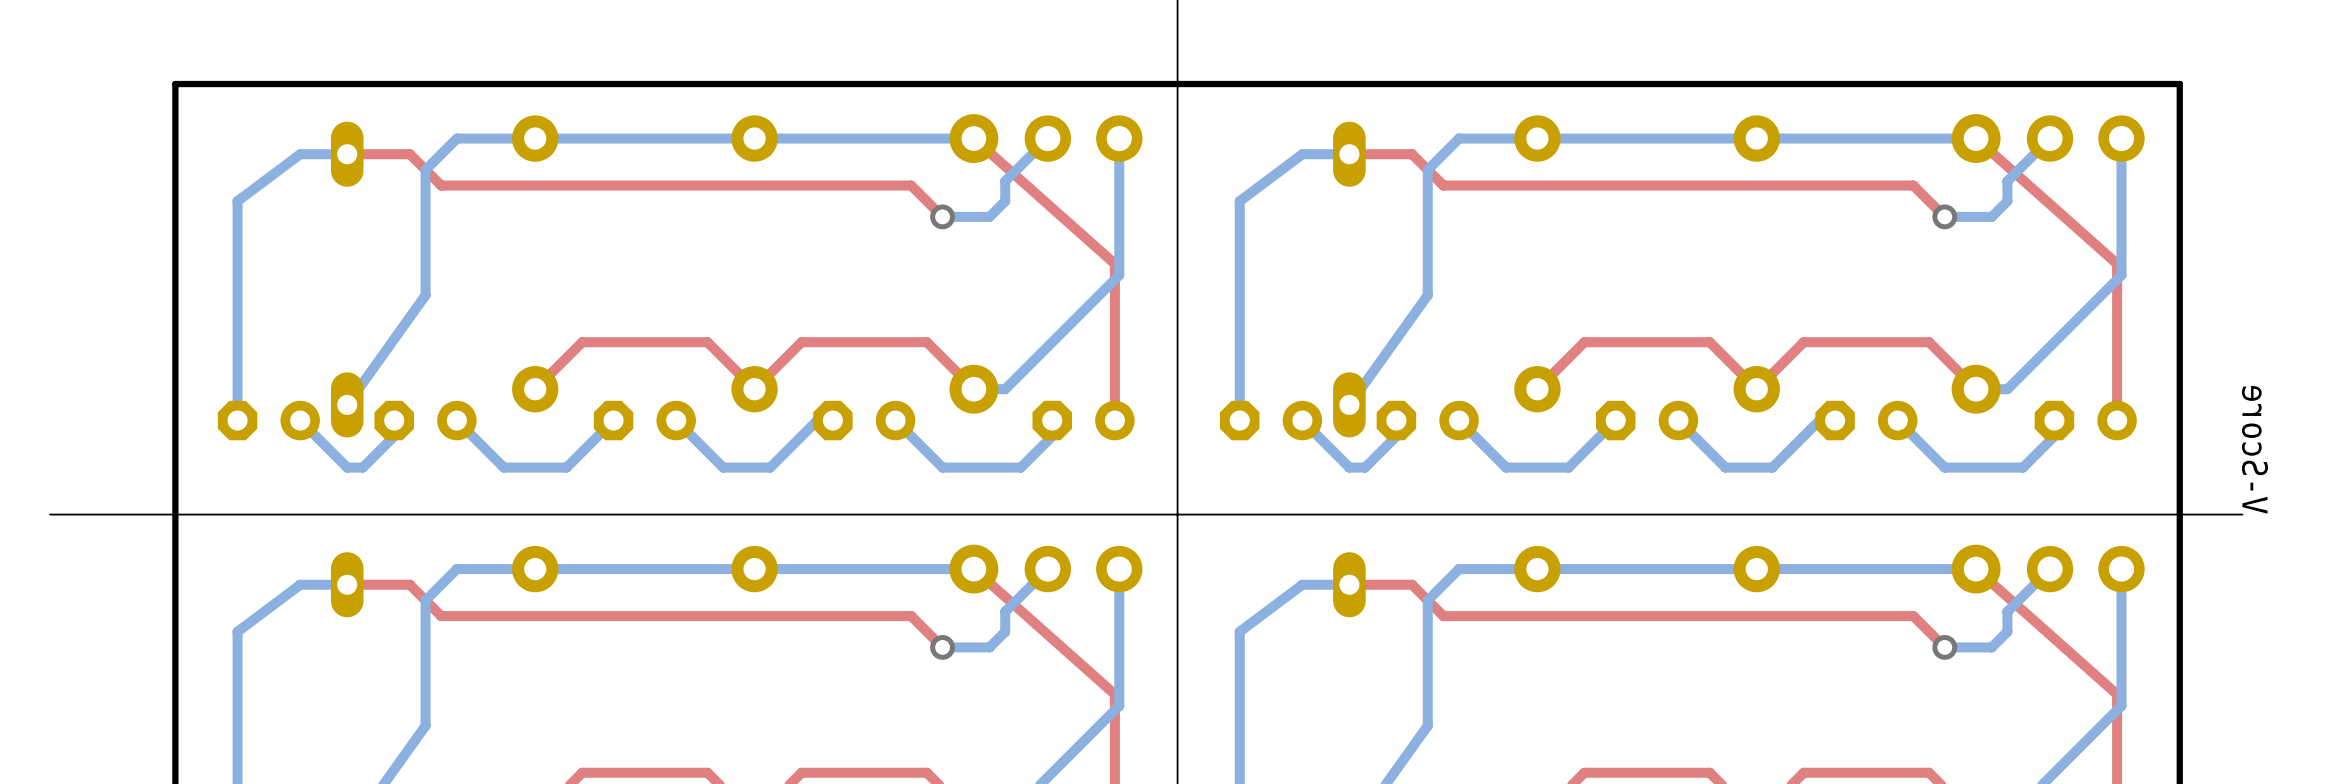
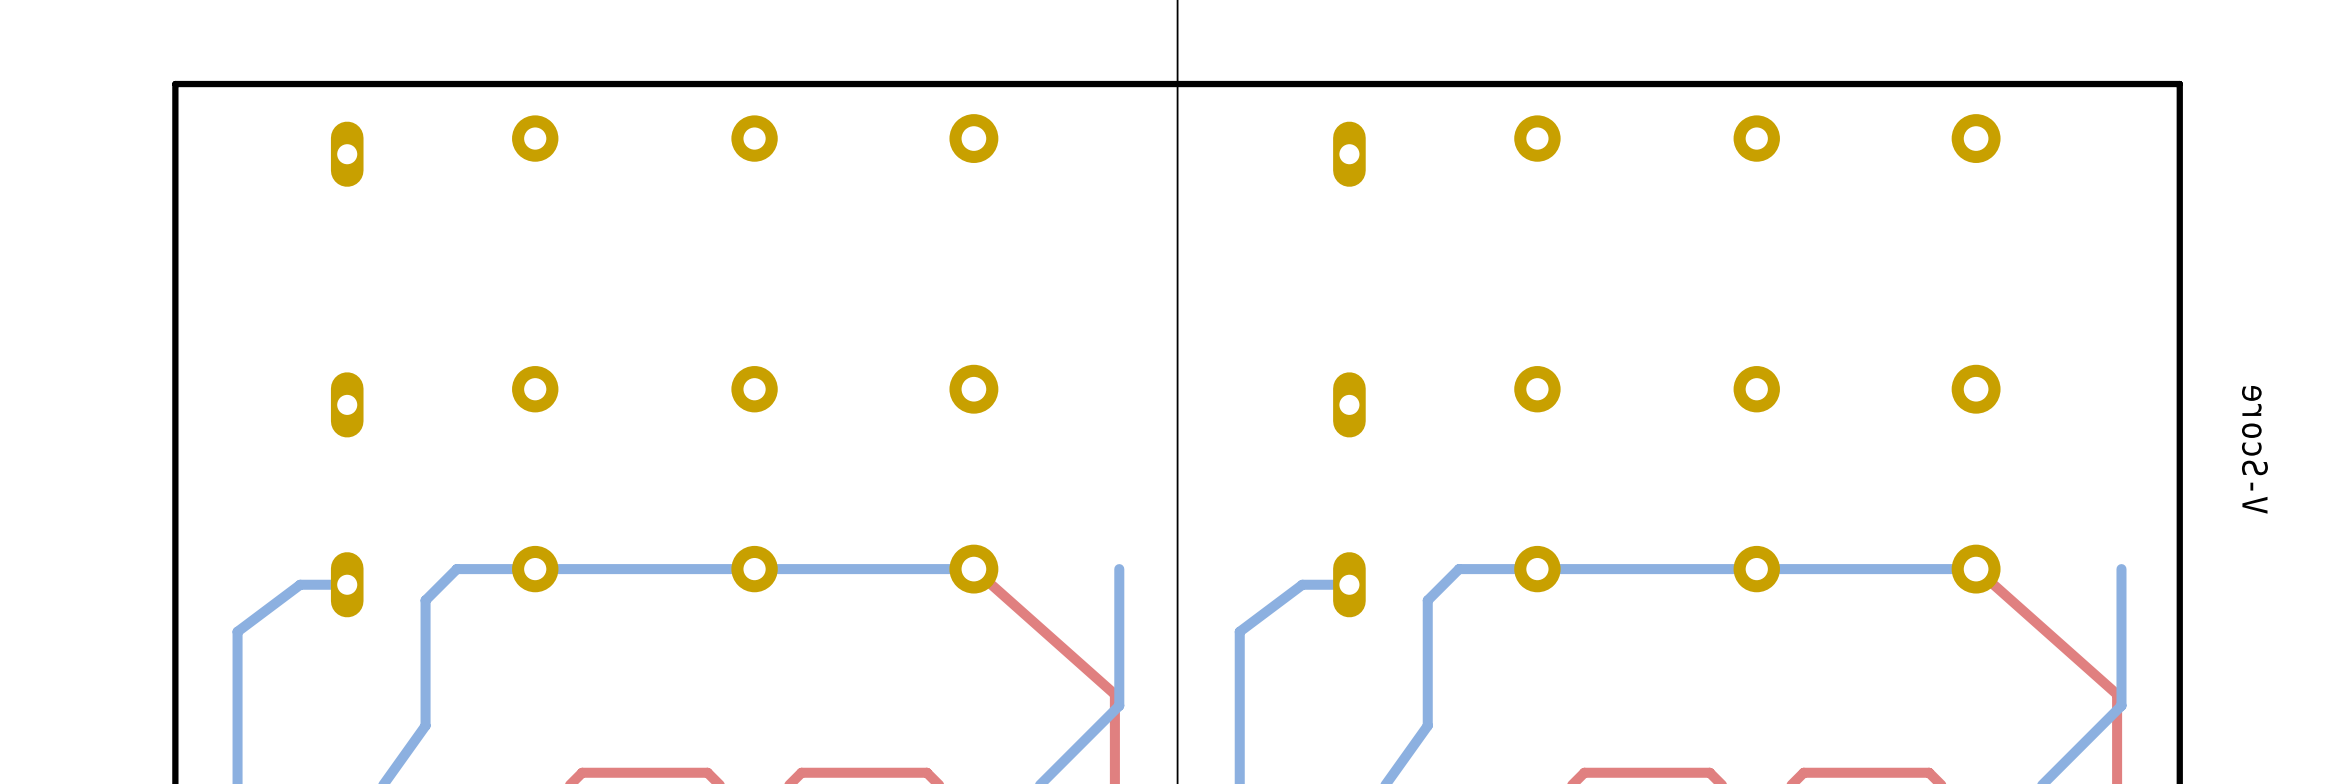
bottom track: (973, 138) (456, 138) (425, 169) (425, 295) (347, 404) -> none
top track: (973, 138) (1114, 263) (1114, 420) -> none
bottom track: (1047, 138) (1005, 181) (1005, 201) (989, 216) (942, 216) -> none
part: (1083, 138) -> none
bottom track: (1119, 138) (1119, 275) (1005, 389) (973, 389) -> none
bottom track: (1976, 138) (1459, 138) (1427, 169) (1427, 295) (1349, 404) -> none
top track: (1976, 138) (2117, 263) (2117, 420) -> none
bottom track: (2050, 138) (2007, 181) (2007, 201) (1991, 216) (1944, 216) -> none
part: (2085, 138) -> none
bottom track: (2121, 138) (2121, 275) (2007, 389) (1976, 389) -> none
bottom track: (347, 154) (300, 154) (237, 201) (237, 420) -> none
top track: (347, 154) (409, 154) (441, 185) (911, 185) (942, 216) -> none
bottom track: (1349, 154) (1302, 154) (1239, 201) (1239, 420) -> none
top track: (1349, 154) (1412, 154) (1443, 185) (1913, 185) (1944, 216) -> none
via: (942, 216) -> none
via: (1944, 216) -> none
top track: (973, 389) (926, 342) (801, 342) (754, 389) (707, 342) (582, 342) (535, 389) -> none
top track: (1976, 389) (1929, 342) (1803, 342) (1756, 389) (1709, 342) (1584, 342) (1537, 389) -> none
part: (268, 420) -> none
bottom track: (394, 420) (394, 436) (362, 467) (347, 467) (300, 420) -> none
part: (425, 420) -> none
bottom track: (613, 420) (566, 467) (503, 467) (456, 420) -> none
part: (644, 420) -> none
bottom track: (832, 420) (817, 420) (770, 467) (723, 467) (676, 420) -> none
part: (864, 420) -> none
bottom track: (1052, 420) (1052, 436) (1020, 467) (942, 467) (895, 420) -> none
part: (1083, 420) -> none
part: (1271, 420) -> none
bottom track: (1396, 420) (1396, 436) (1365, 467) (1349, 467) (1302, 420) -> none
part: (1427, 420) -> none
bottom track: (1615, 420) (1568, 467) (1506, 467) (1459, 420) -> none
part: (1647, 420) -> none
bottom track: (1835, 420) (1819, 420) (1772, 467) (1725, 467) (1678, 420) -> none
part: (1866, 420) -> none
bottom track: (2054, 420) (2054, 436) (2023, 467) (1944, 467) (1897, 420) -> none
part: (2085, 420) -> none
board edge: (2242, 514) (50, 514) -> none
bottom track: (1047, 569) (1005, 611) (1005, 631) (989, 647) (942, 647) -> none
part: (1083, 569) -> none
bottom track: (2050, 569) (2007, 611) (2007, 631) (1991, 647) (1944, 647) -> none
part: (2085, 569) -> none
top track: (347, 584) (409, 584) (441, 616) (911, 616) (942, 647) -> none
top track: (1349, 584) (1412, 584) (1443, 616) (1913, 616) (1944, 647) -> none
via: (942, 647) -> none
via: (1944, 647) -> none

